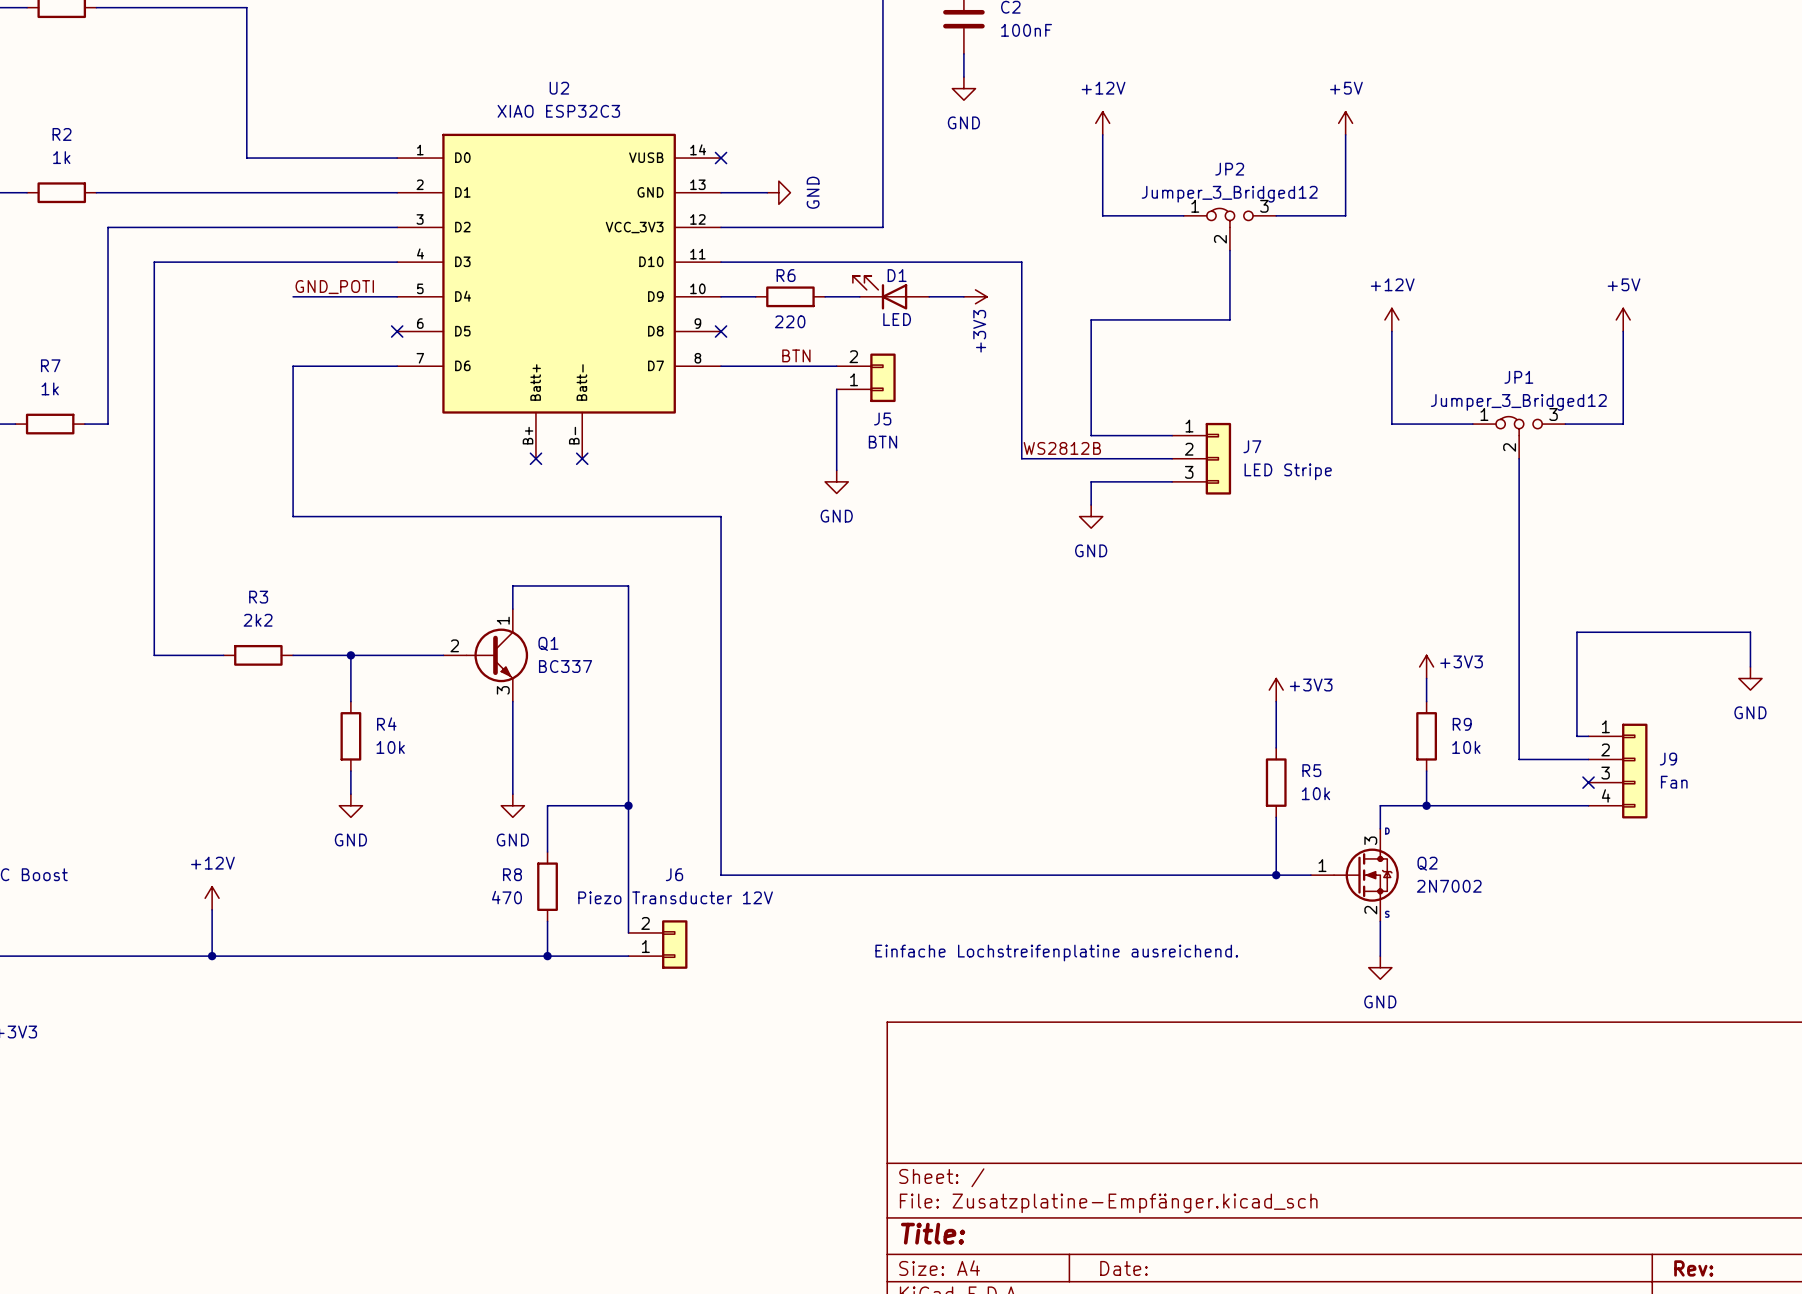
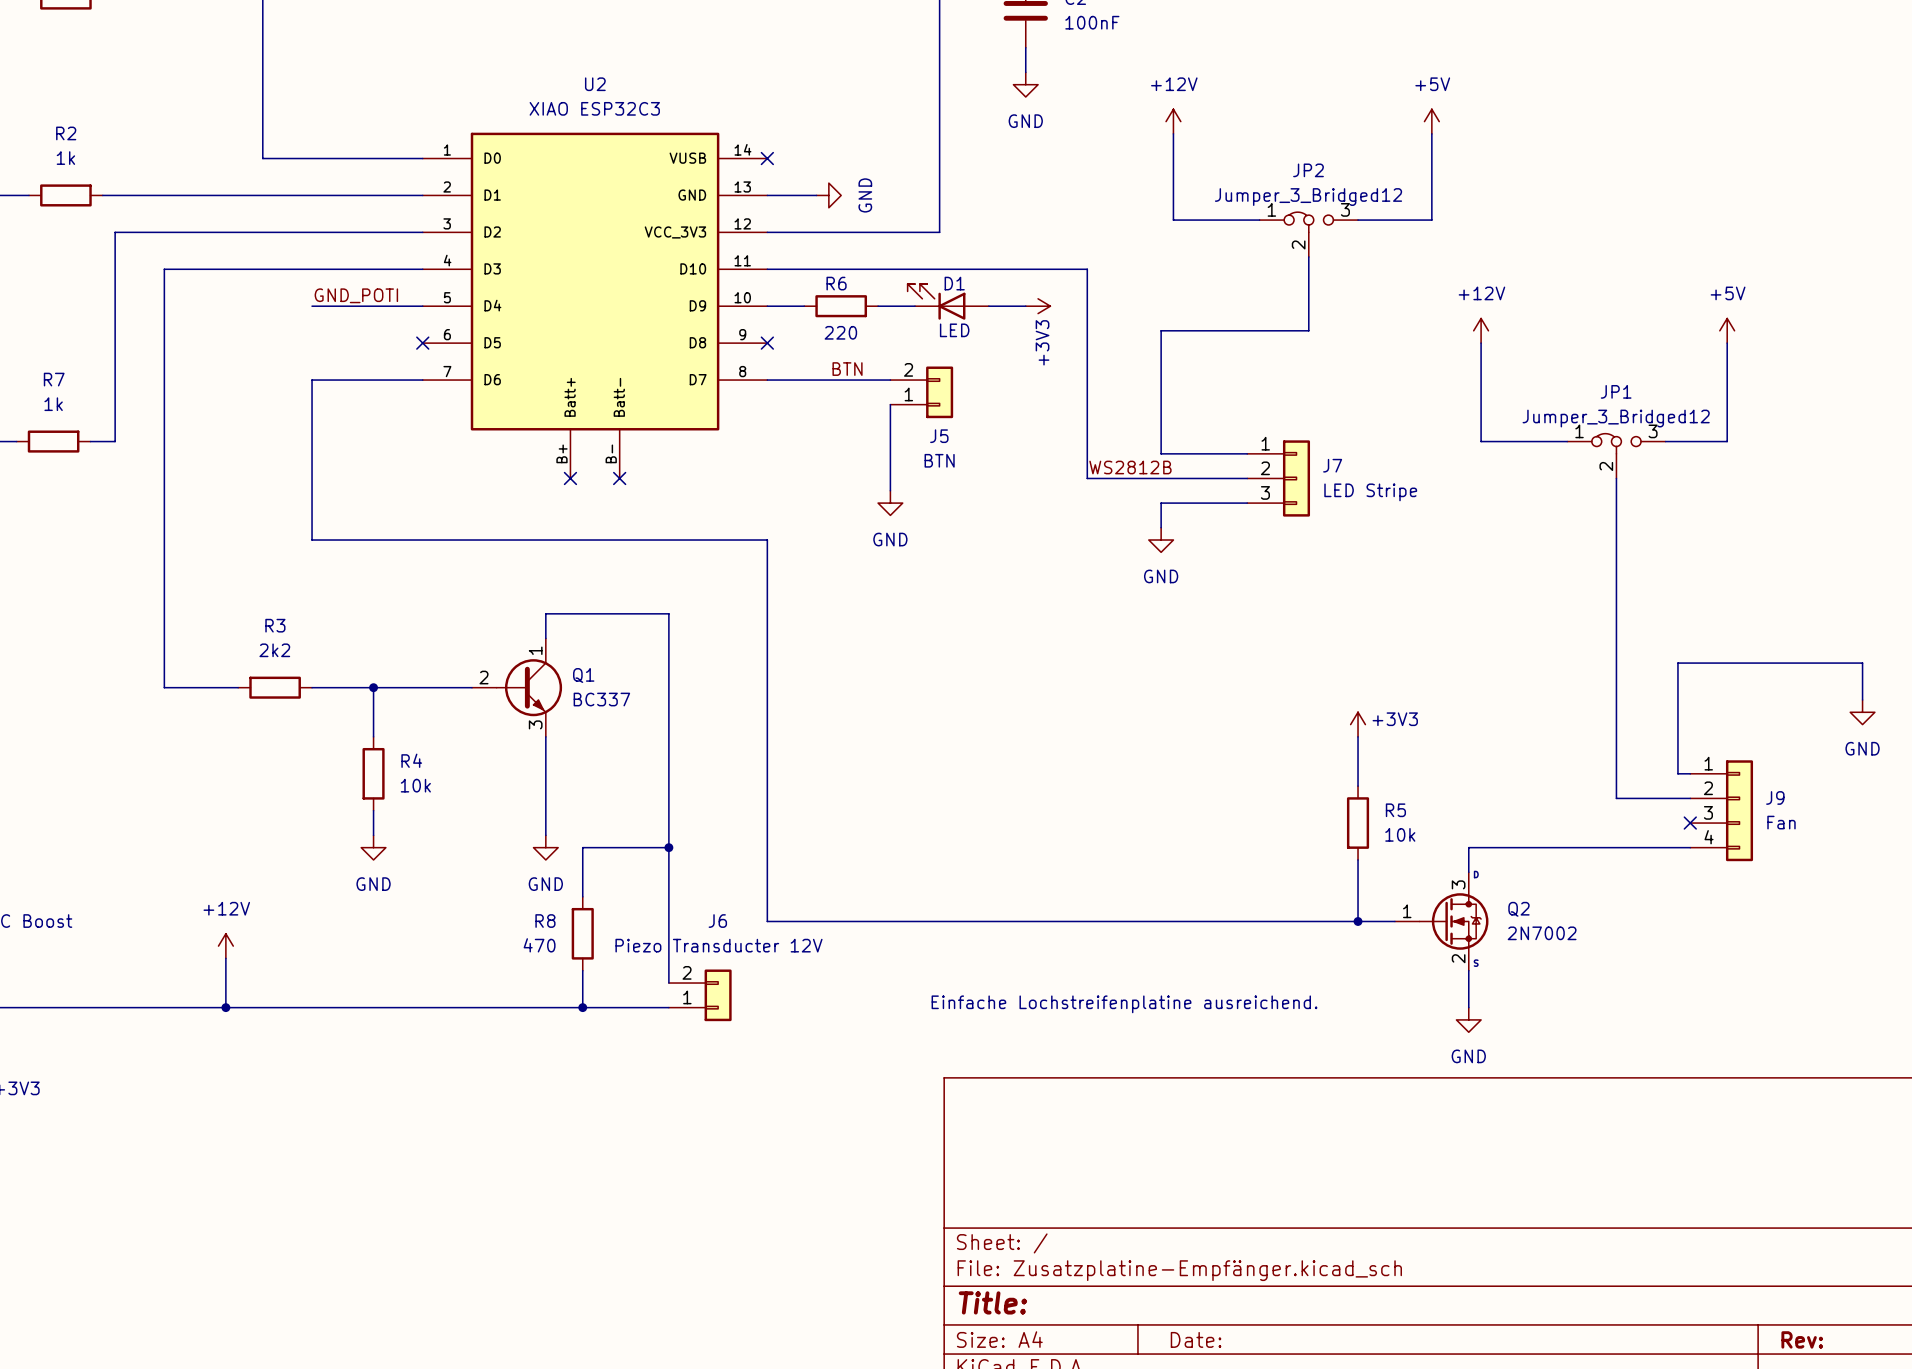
power symbol: +3V3 (1426, 666) -> none
wire: (1426, 678) (1426, 701) -> none
R9: 10k (1426, 736) -> none
wire: (1426, 771) (1426, 805) -> none
junction: (1426, 805) -> none

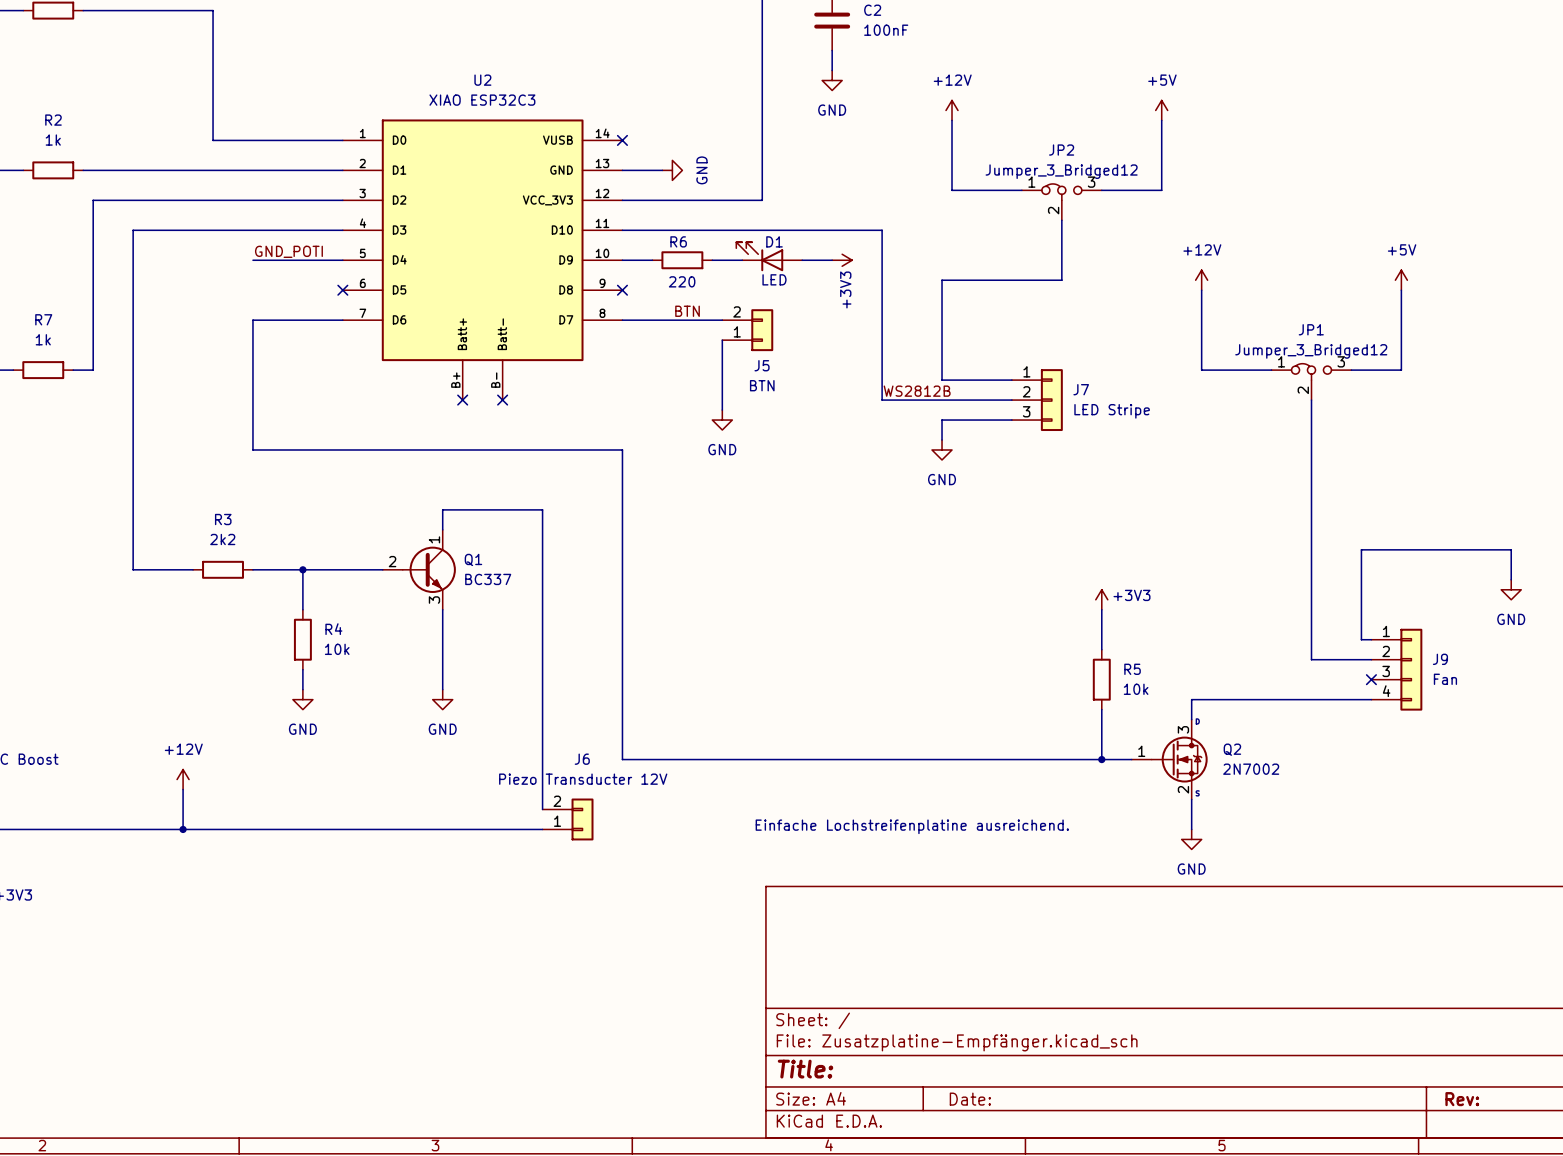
wire: (668, 847) (582, 847) (582, 896) -> none
junction: (668, 847) -> none
R8: 470 (582, 933) -> none
wire: (582, 970) (582, 1007) -> none
junction: (582, 1007) -> none

